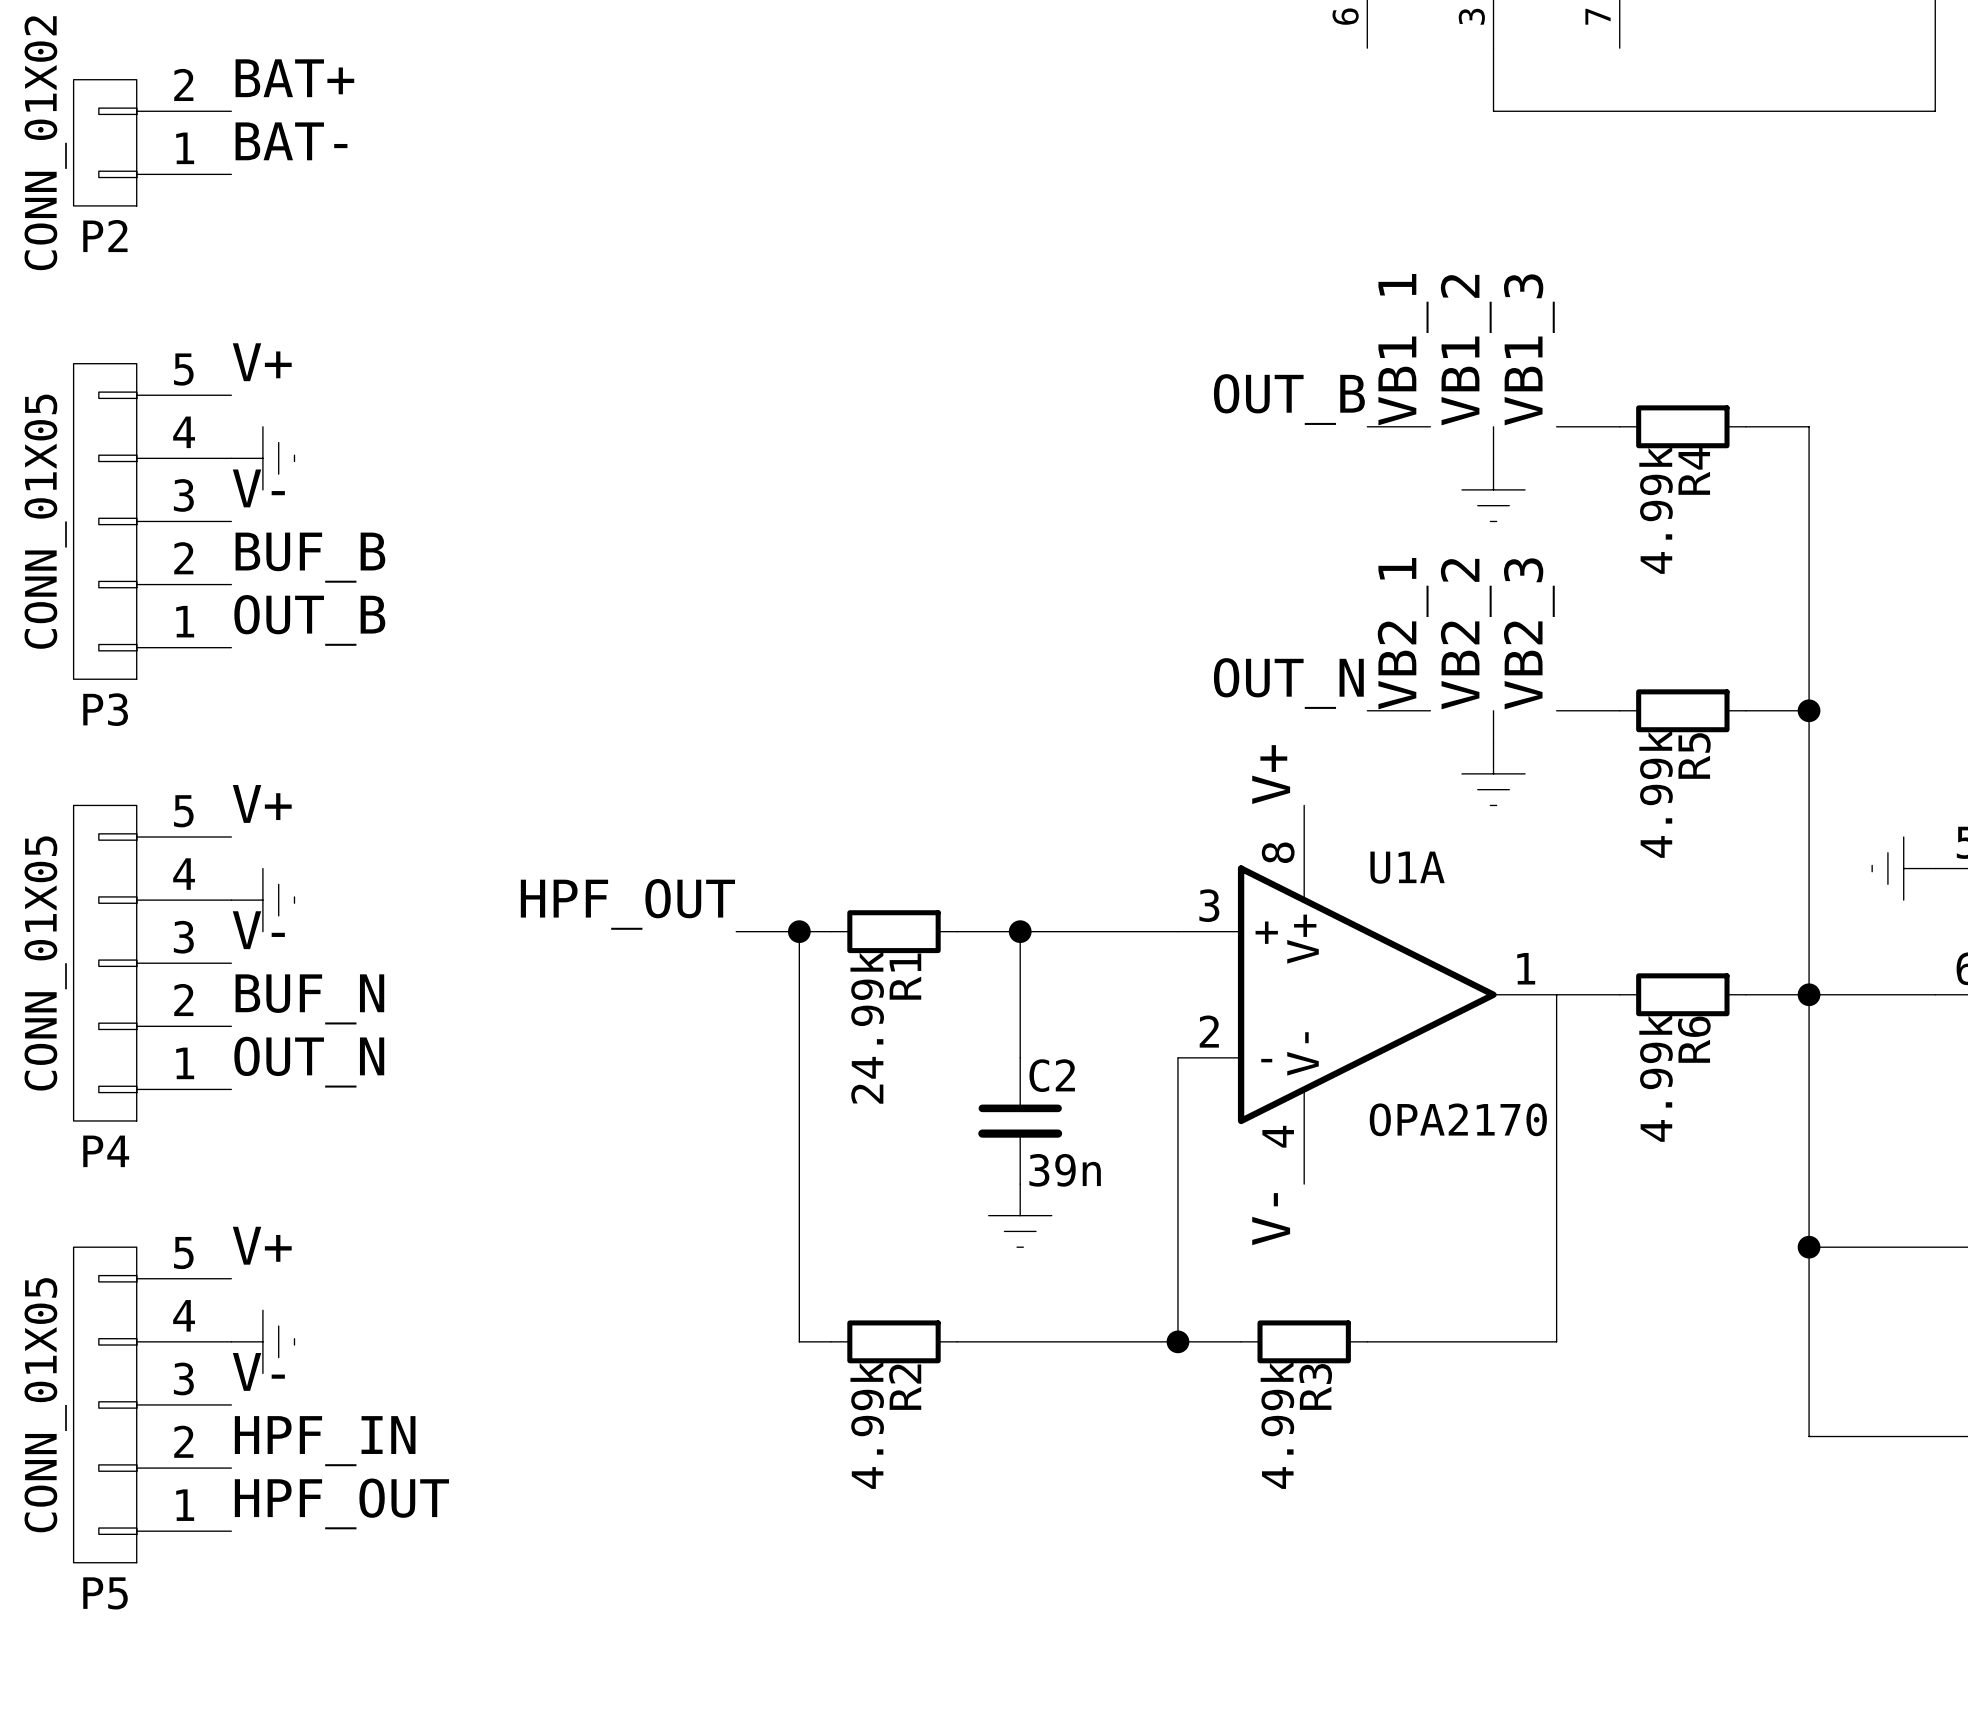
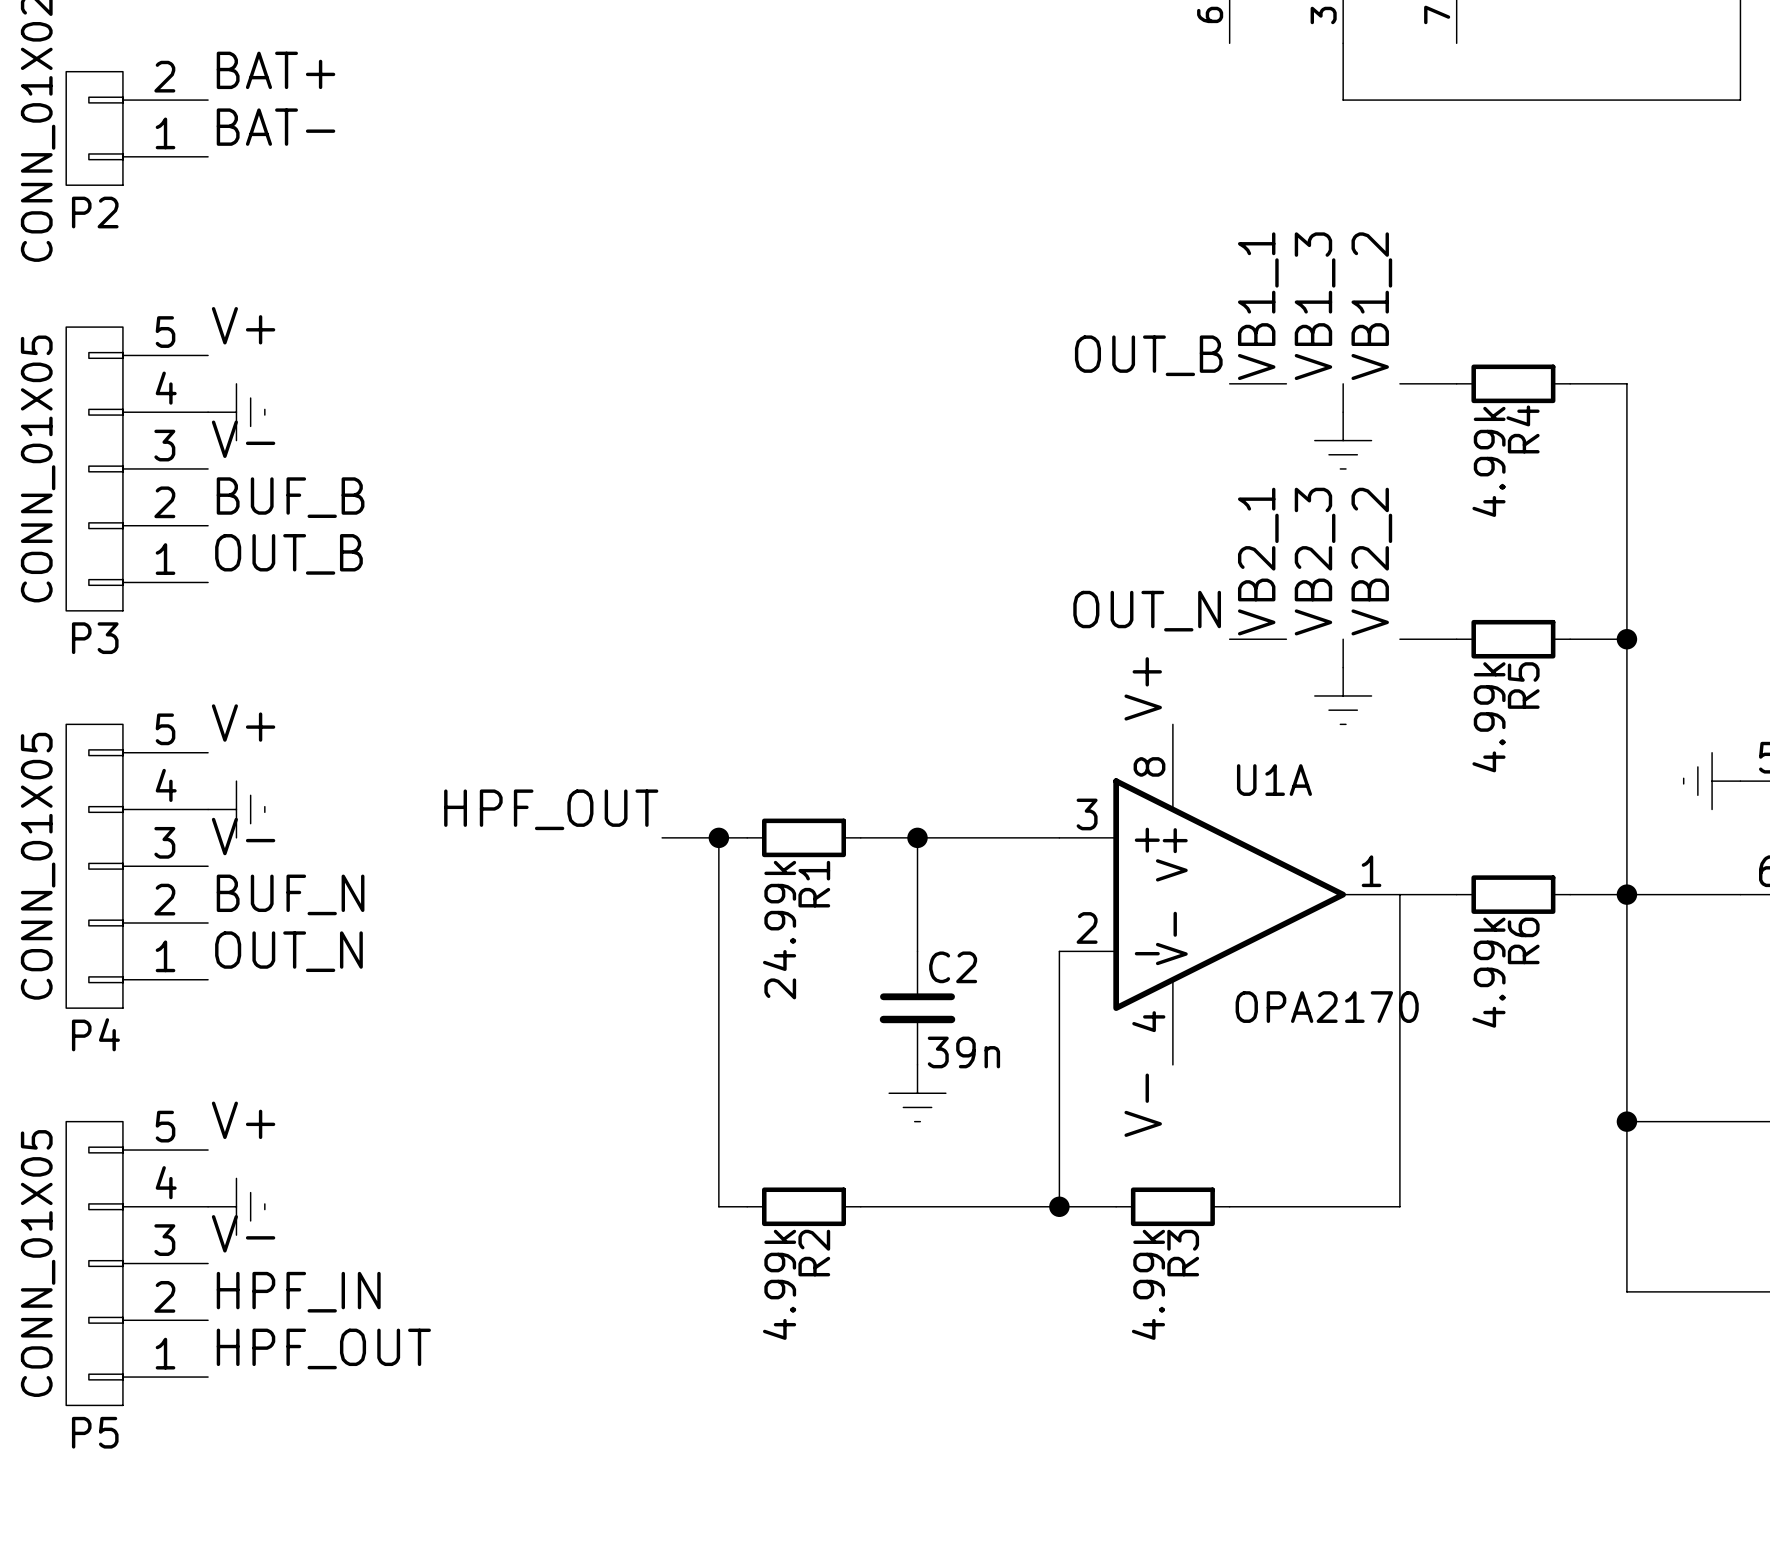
label: VB1_3 (1529, 349) -> VB1_2 (1371, 306)
label: VB1_2 (1466, 350) -> VB1_3 (1315, 306)
label: VB2_3 (1529, 633) -> VB2_2 (1371, 561)
label: VB2_2 (1466, 634) -> VB2_3 (1315, 561)

